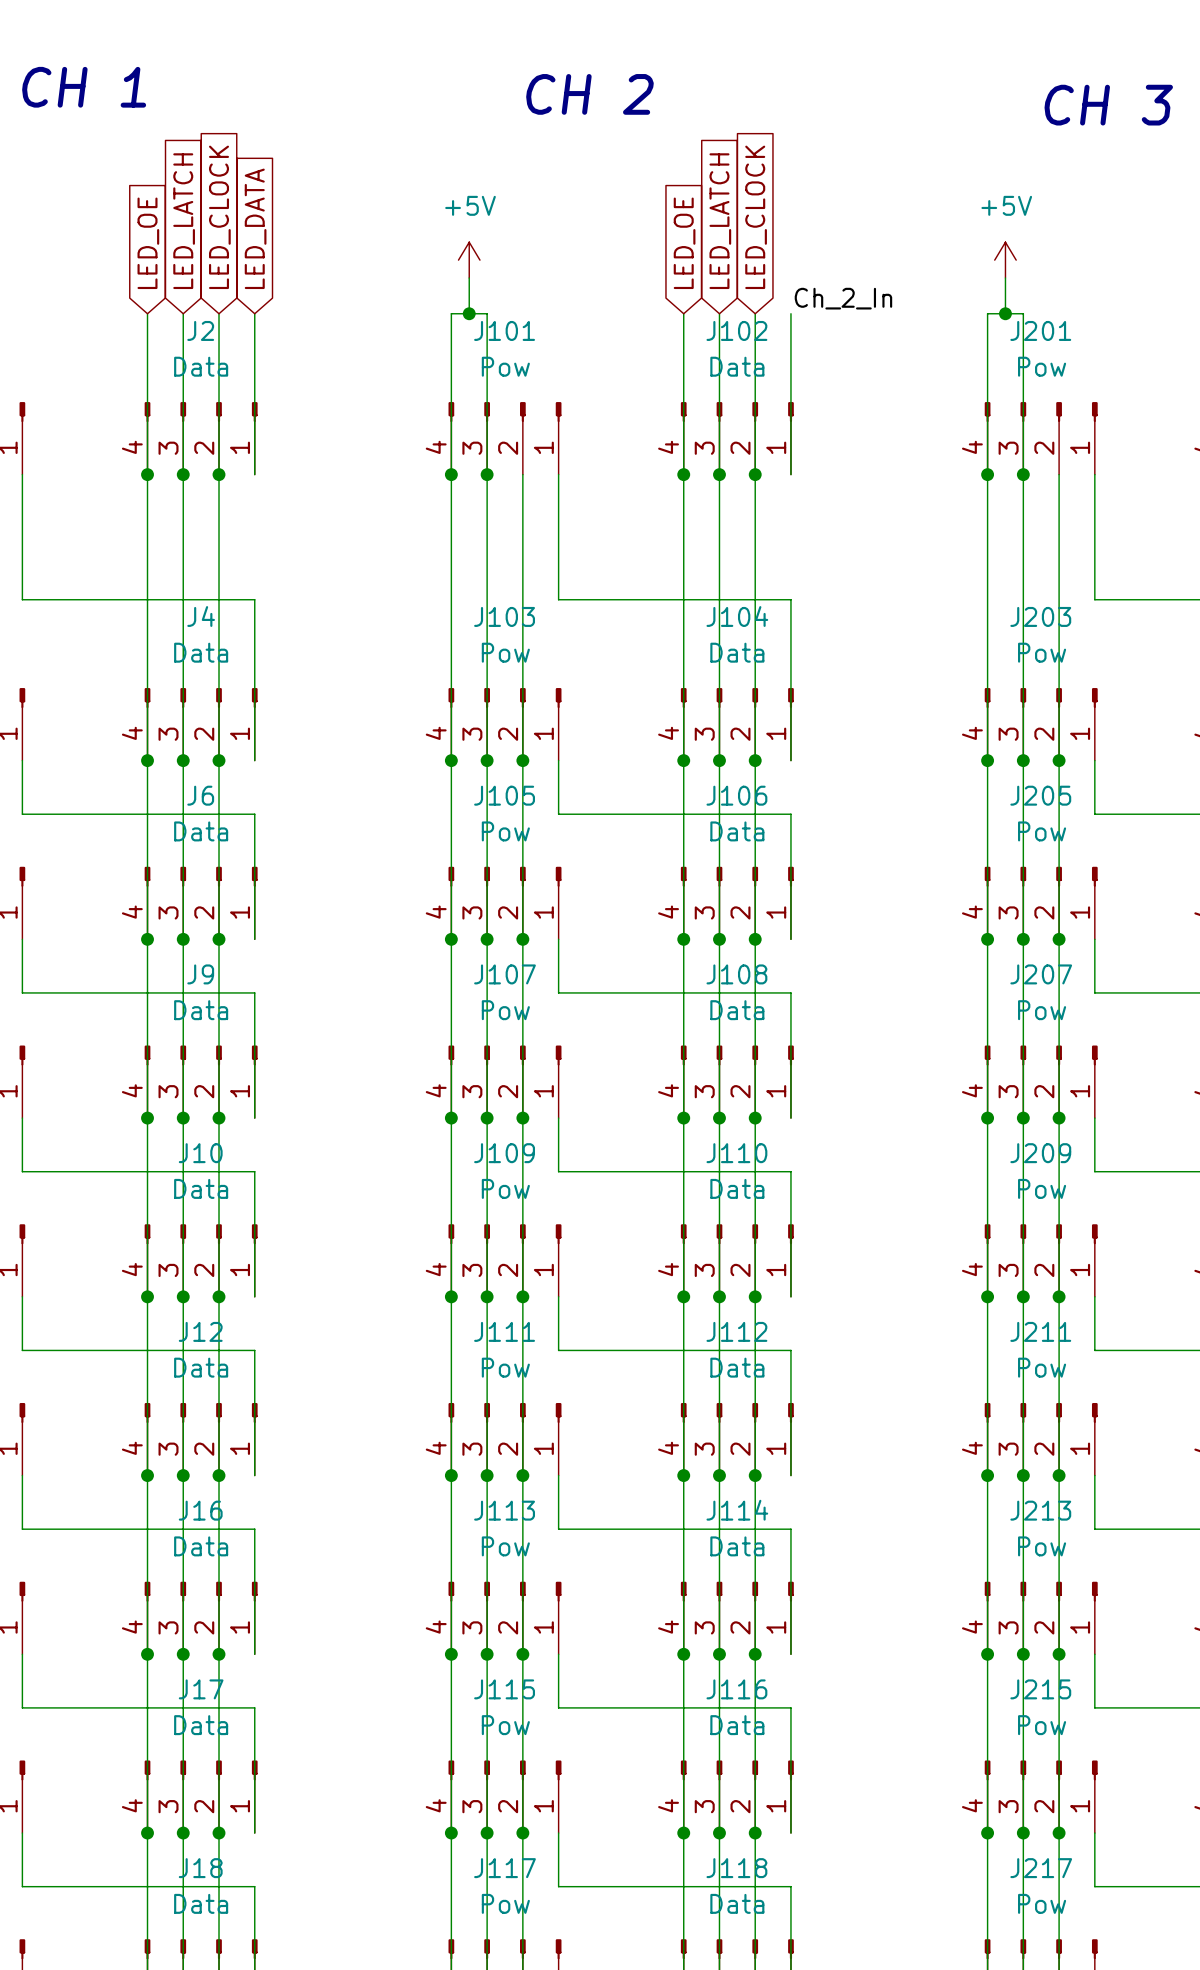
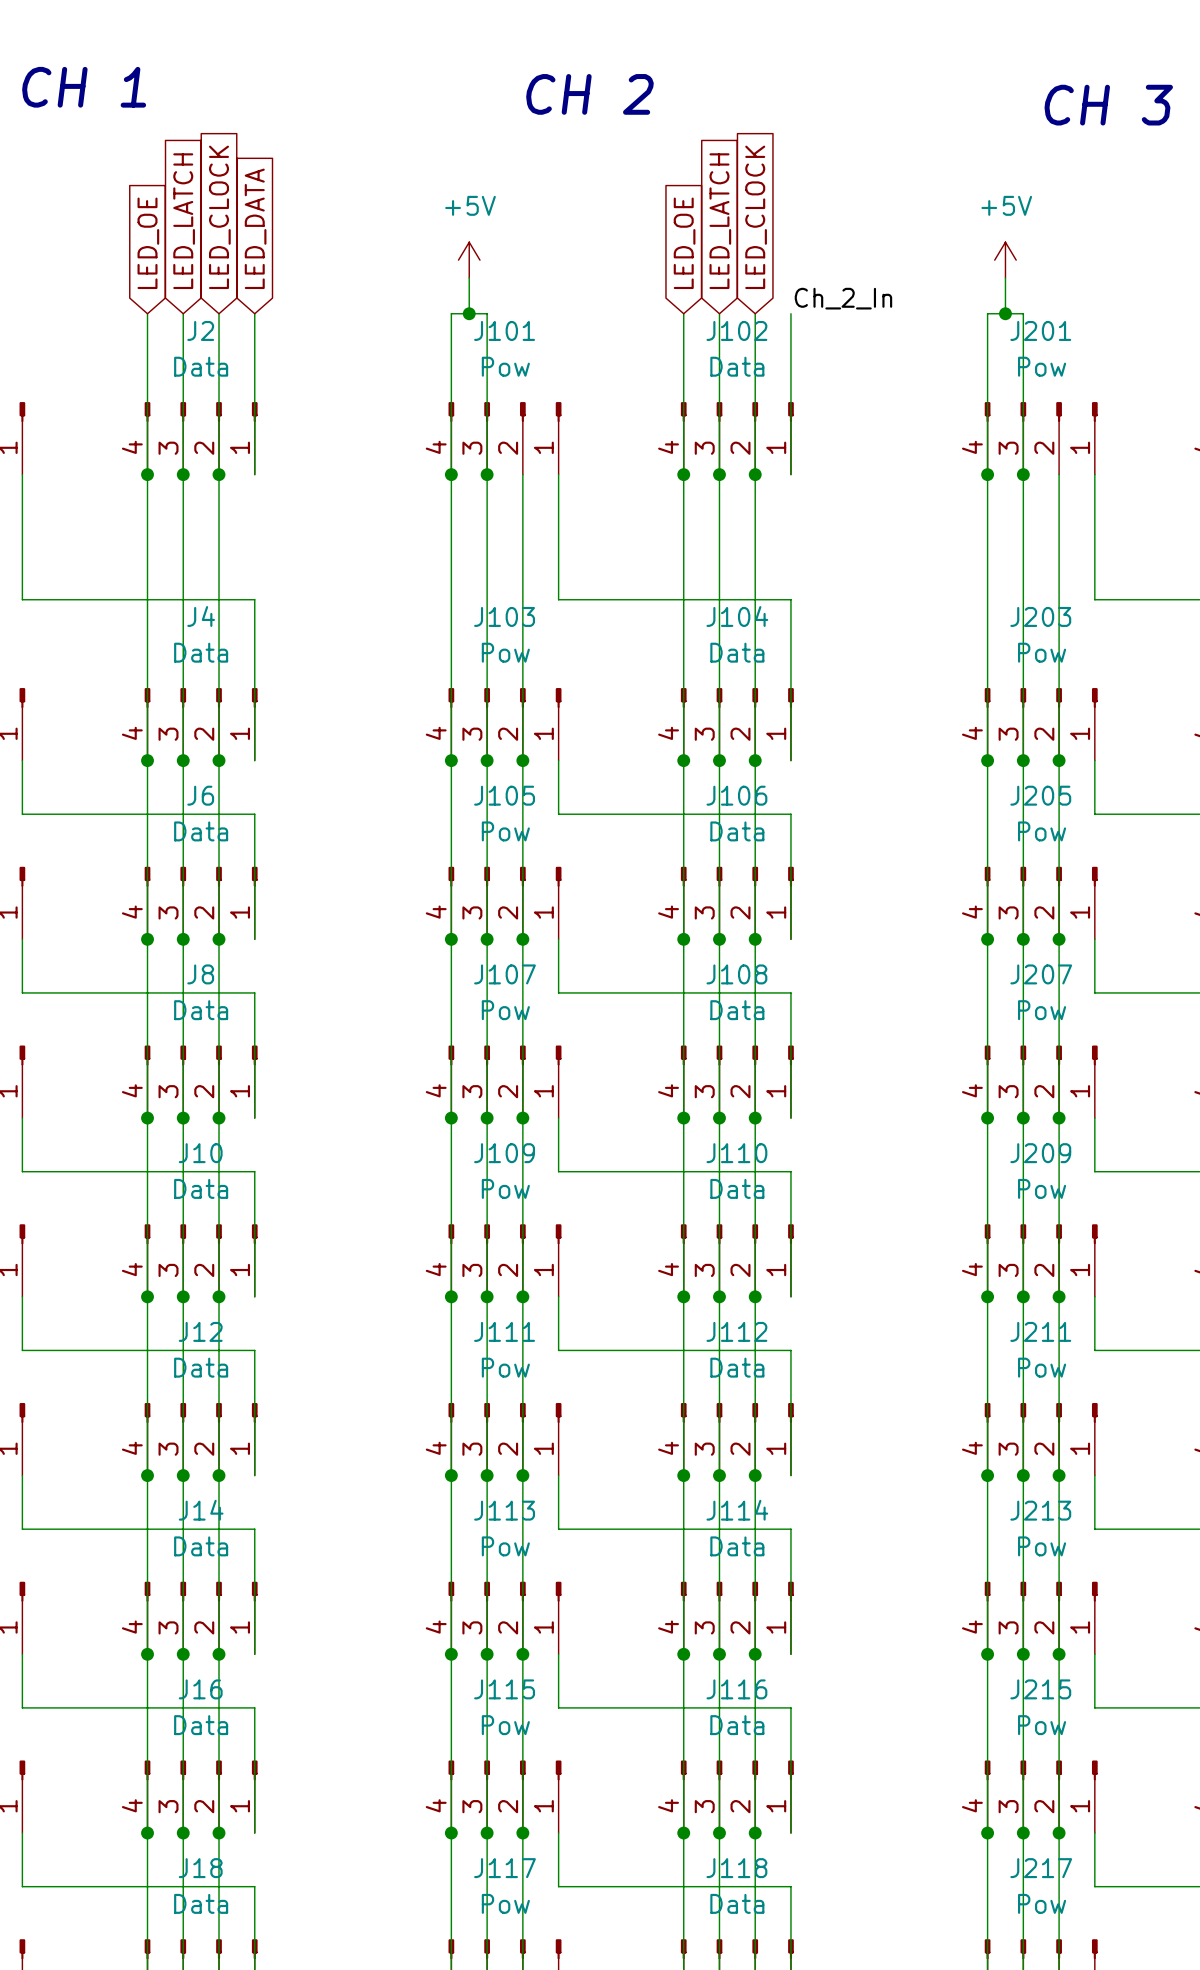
J9 name: J9 (200, 974) -> J8 (200, 974)
J16 name: J16 (200, 1510) -> J14 (201, 1510)
J17 name: J17 (201, 1689) -> J16 (200, 1689)

